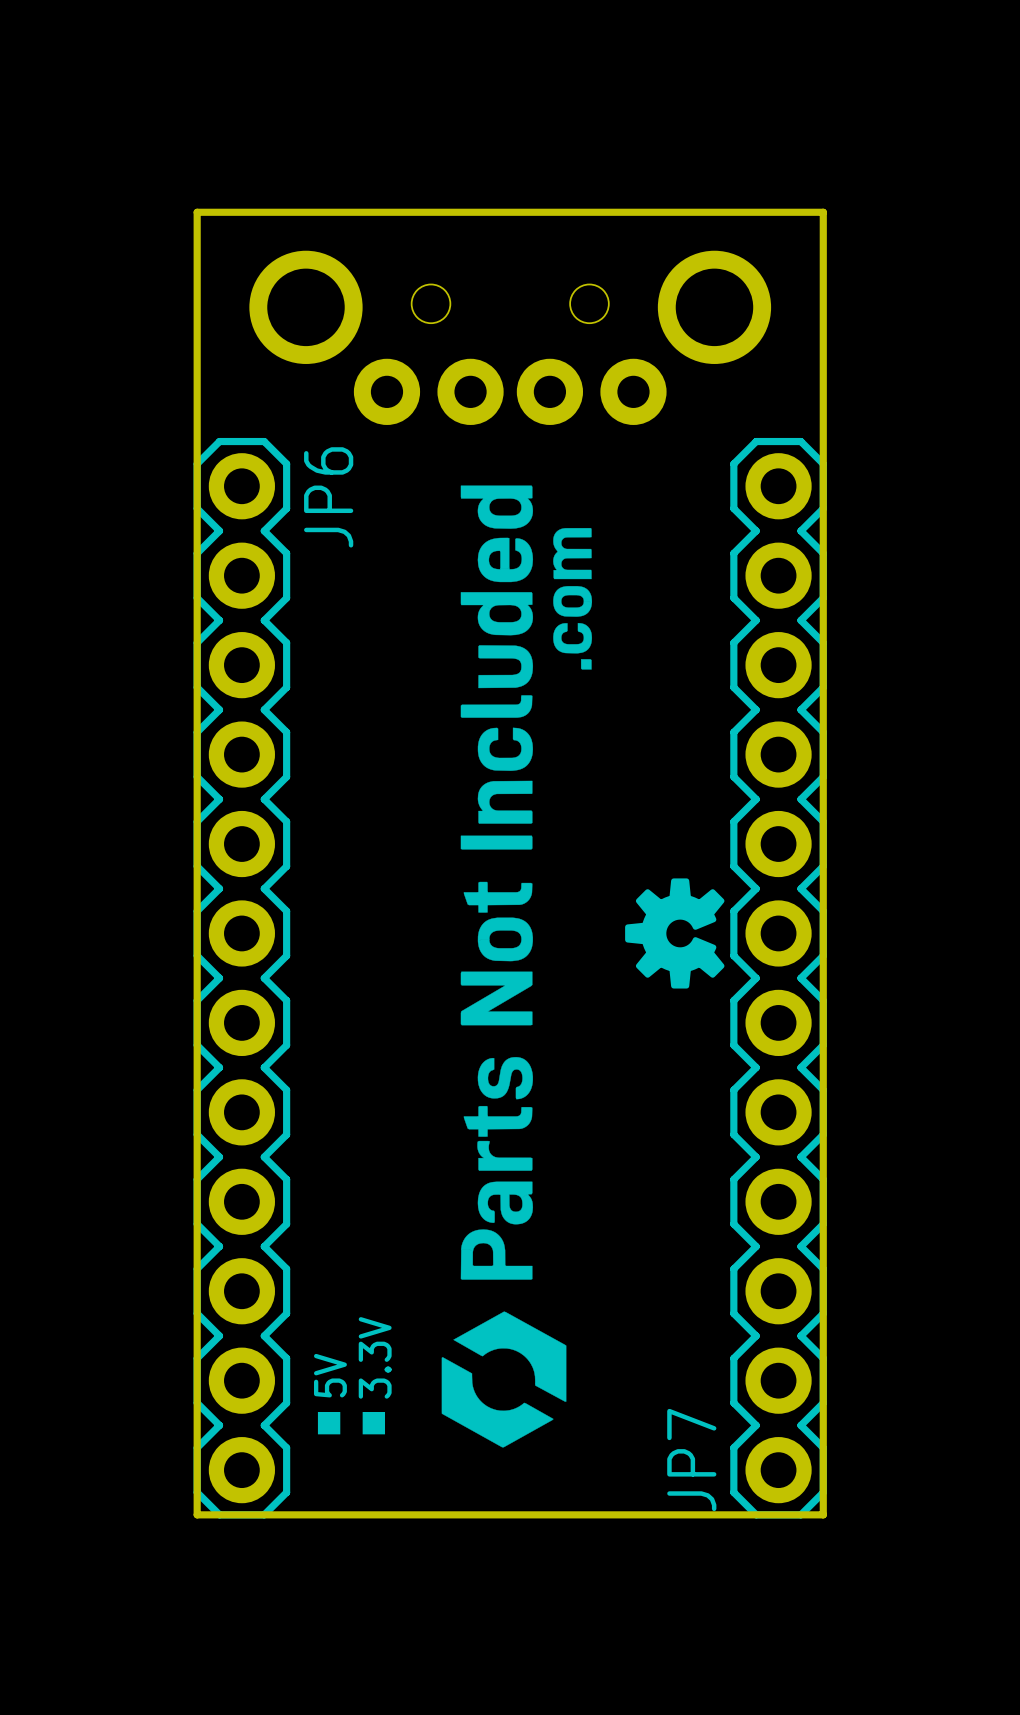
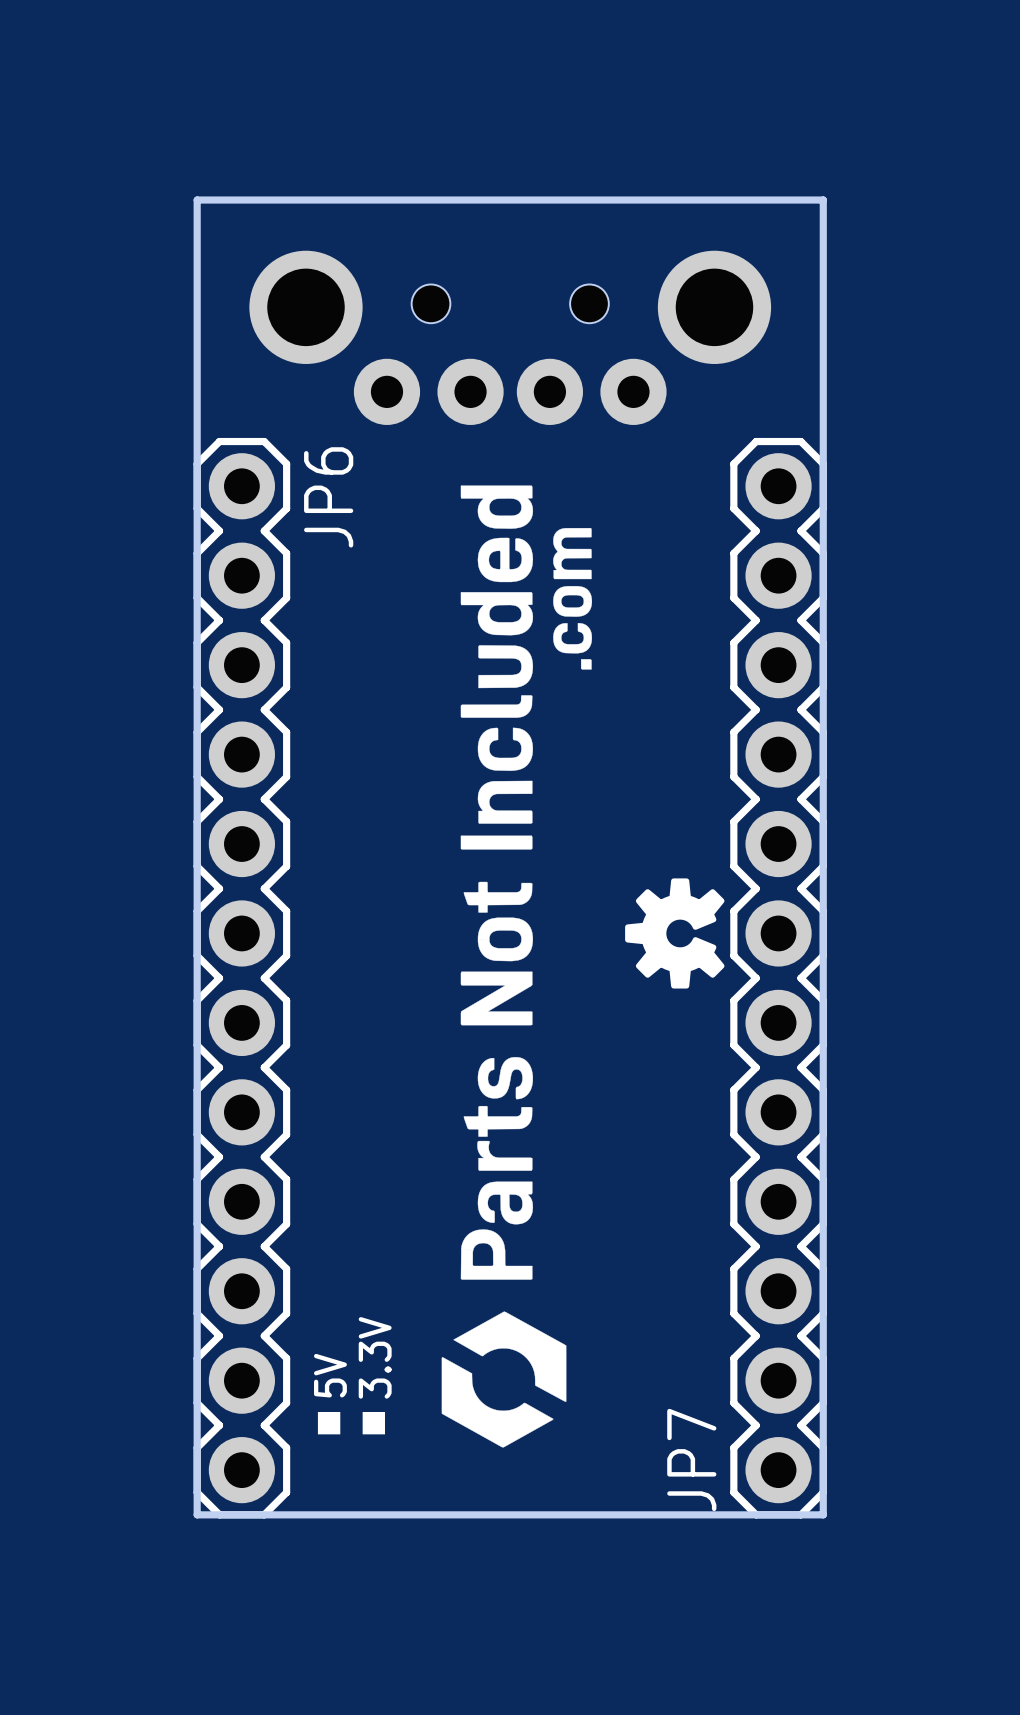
board edge: (823, 212) (197, 212) -> (823, 212) (823, 200) (197, 200) (197, 212)

